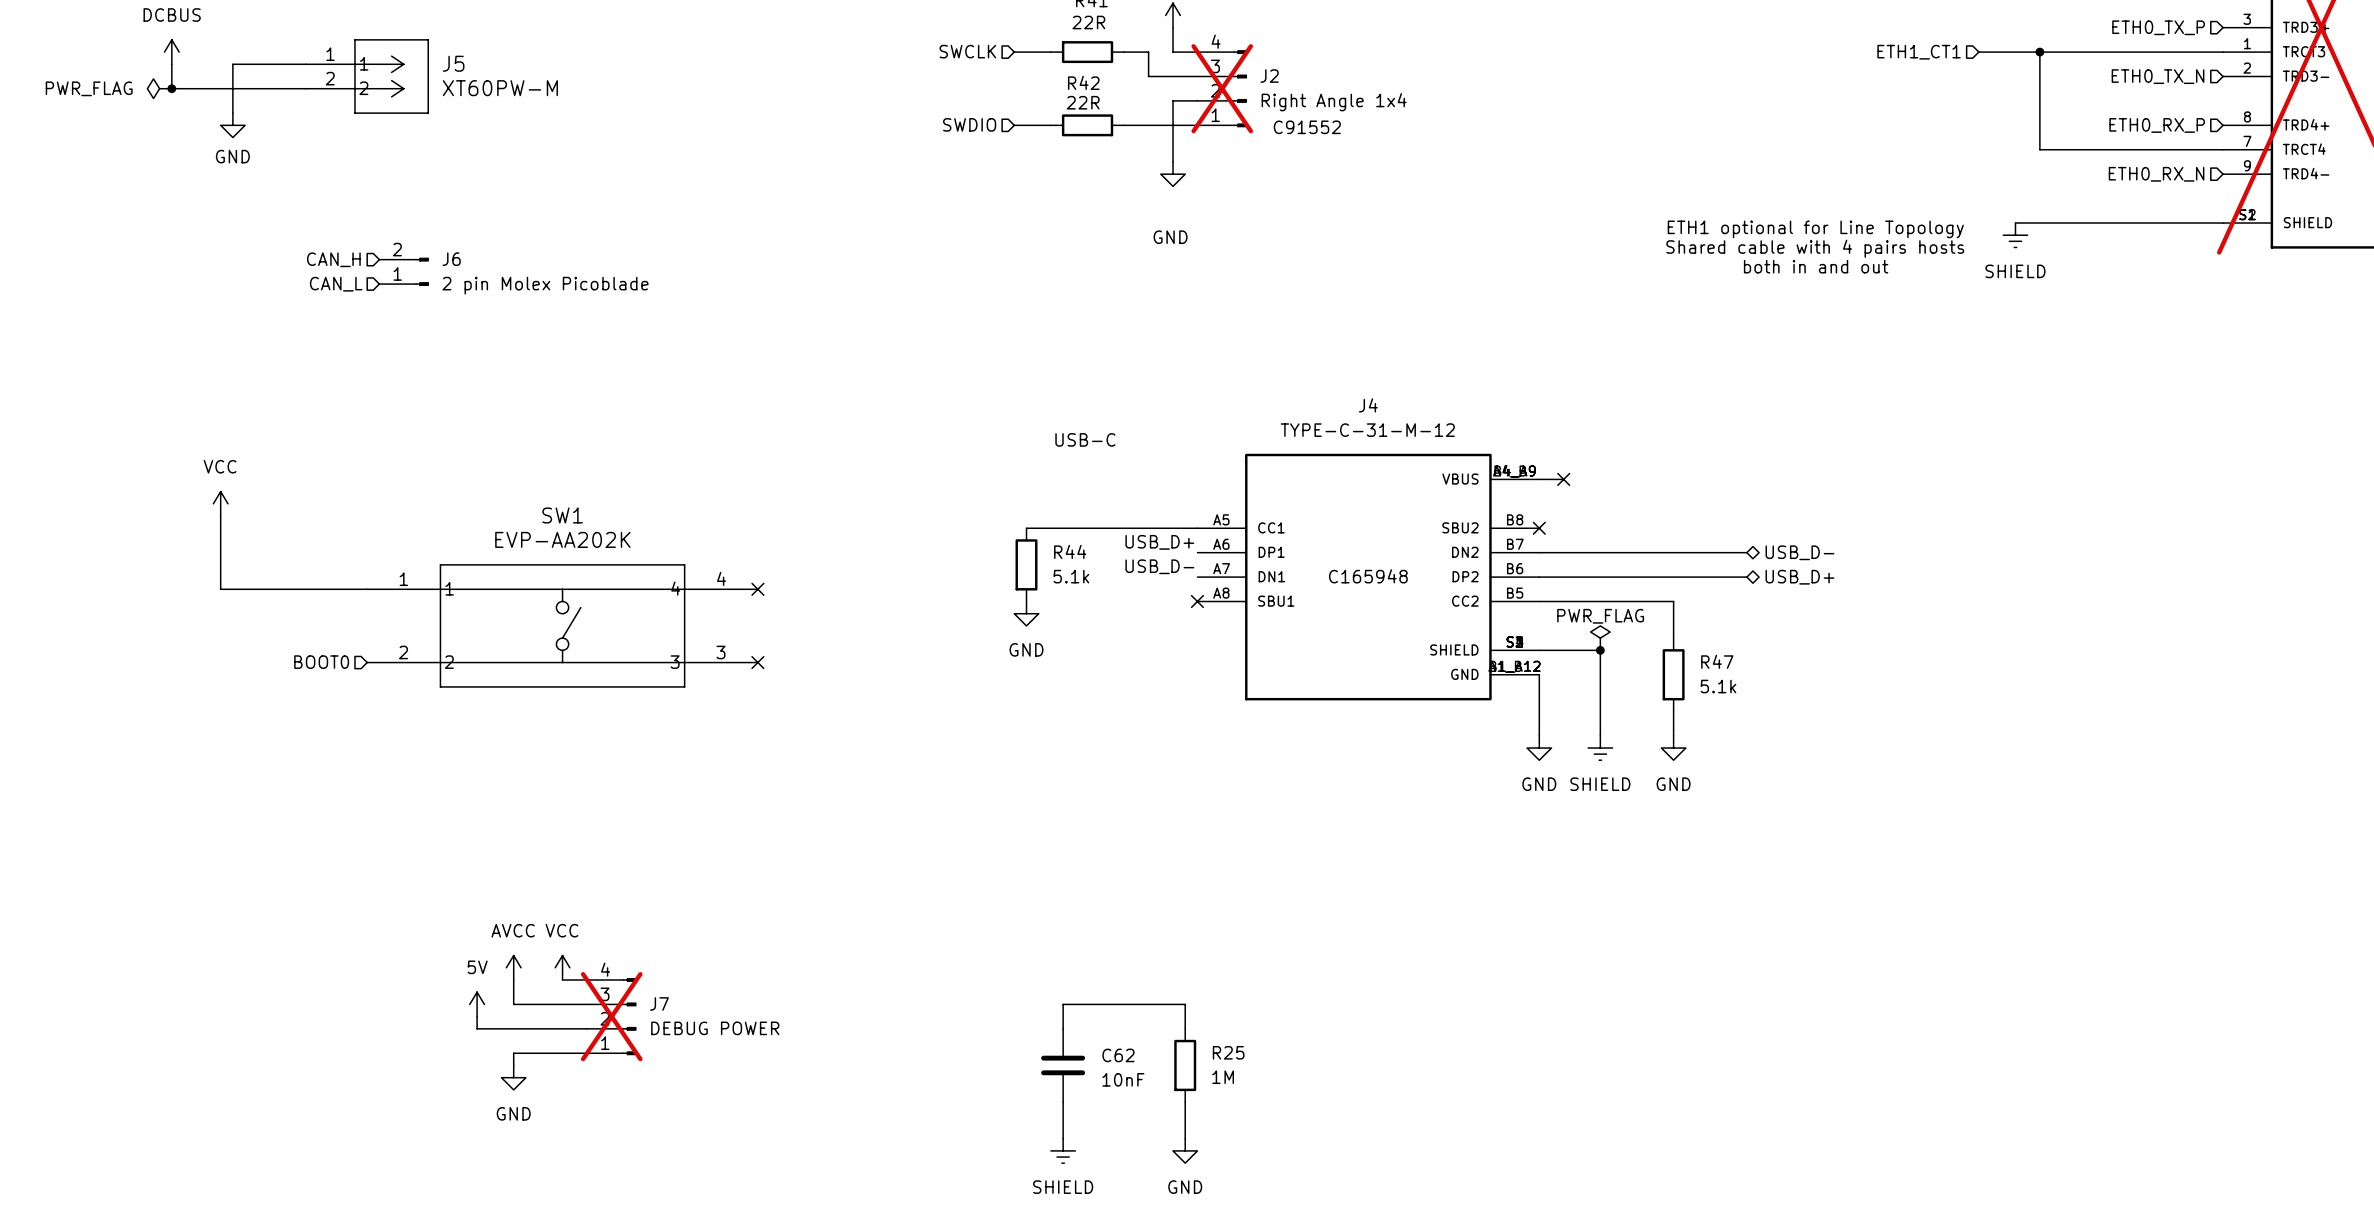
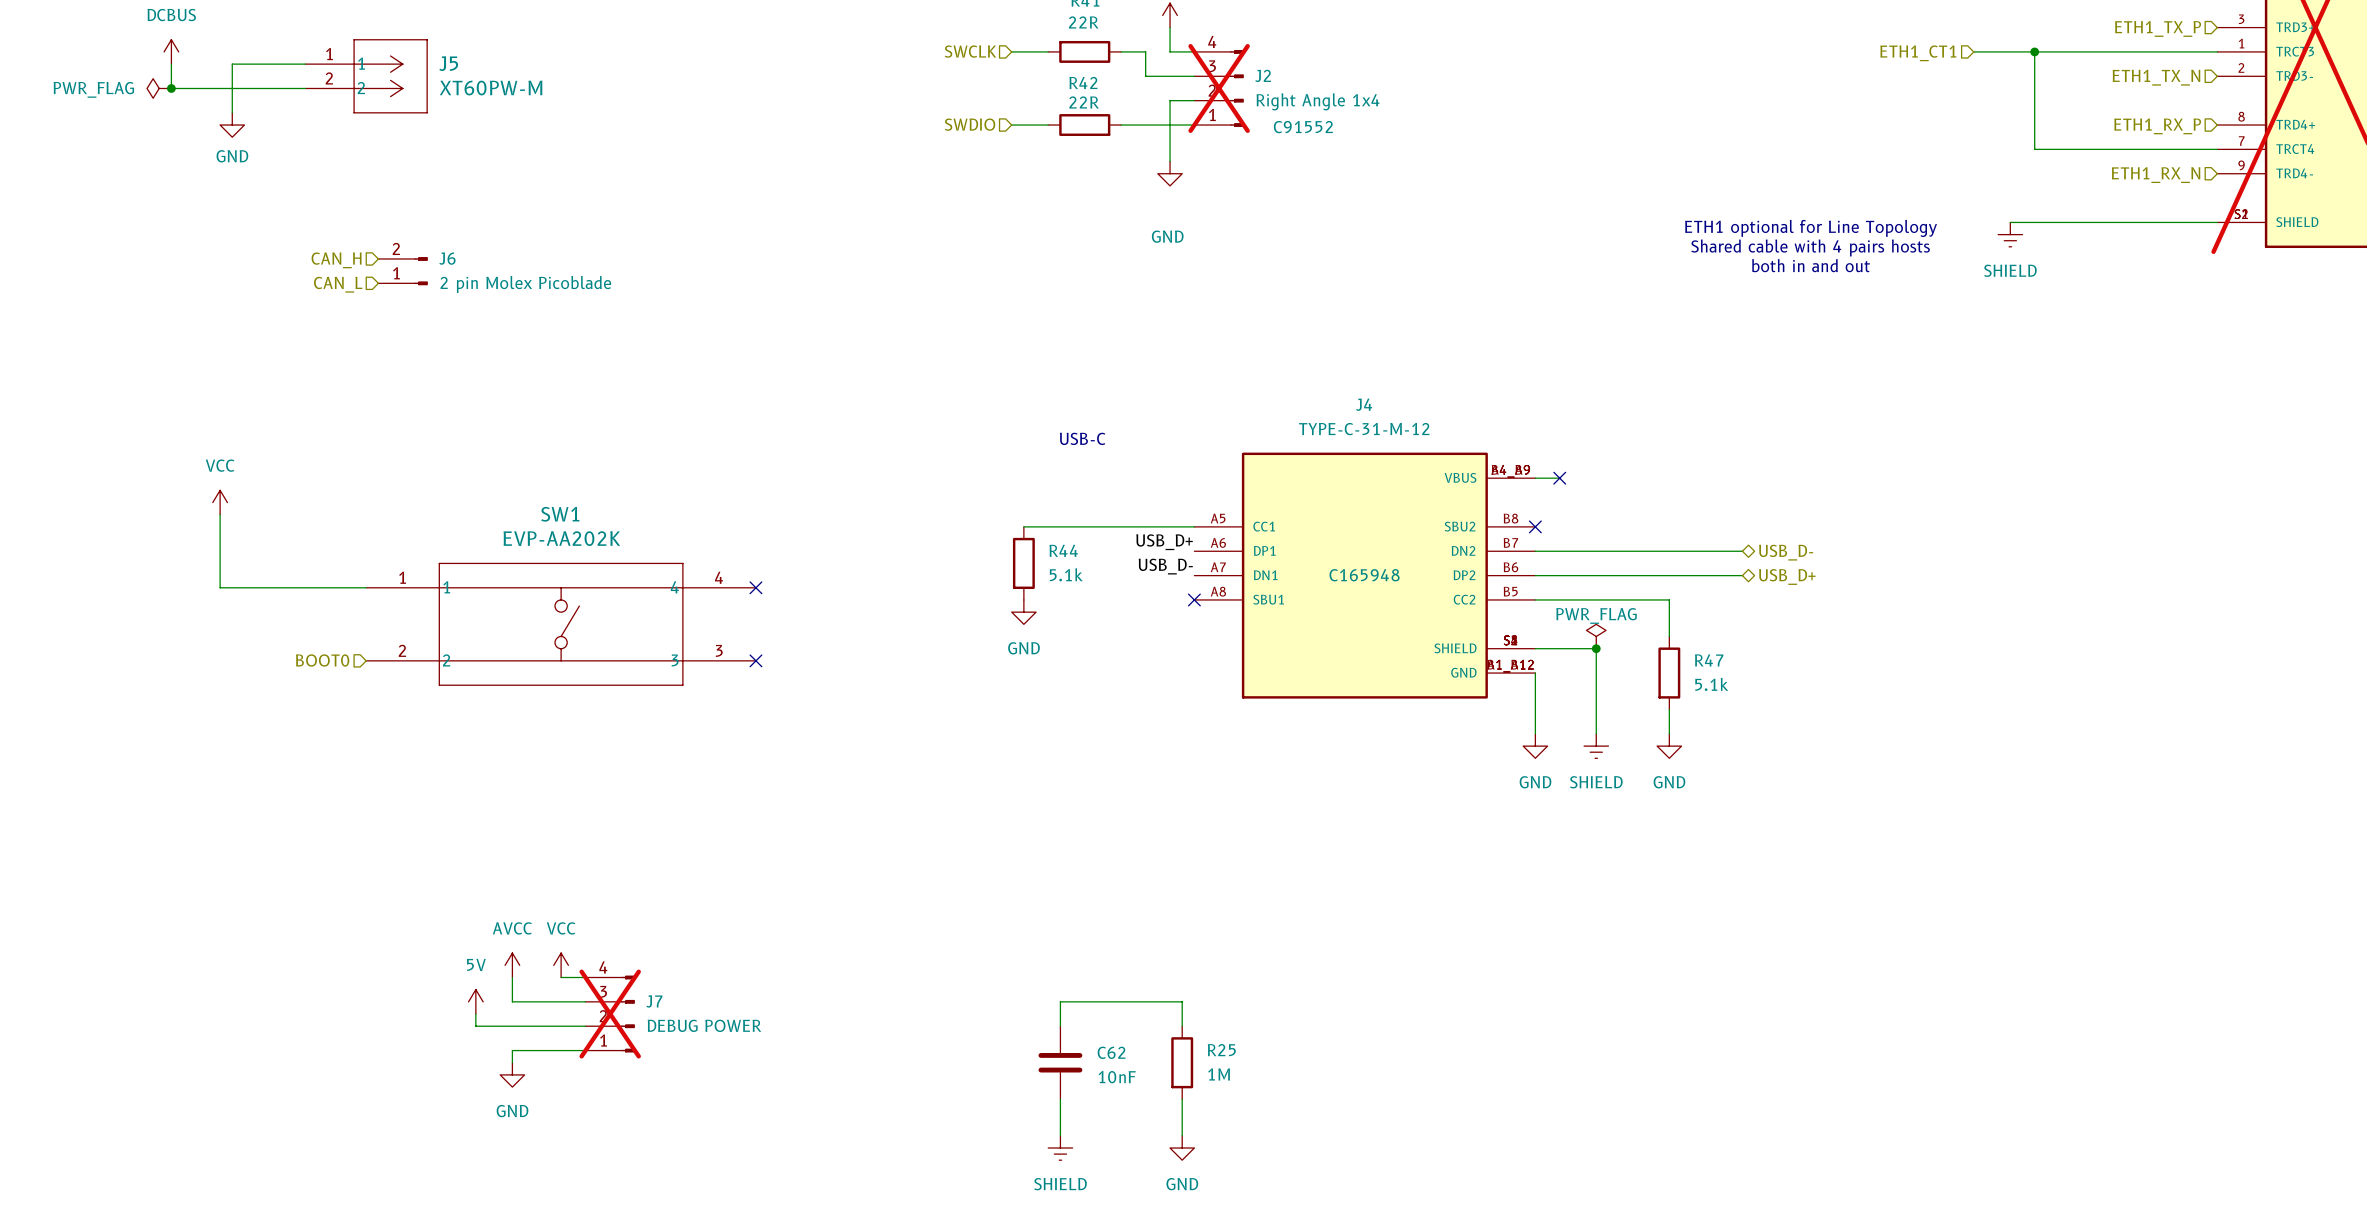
hierarchical label: ETH0_TX_P (2158, 27) -> ETH1_TX_P (2158, 28)
hierarchical label: ETH0_TX_N (2158, 76) -> ETH1_TX_N (2156, 77)
hierarchical label: ETH0_RX_P (2157, 125) -> ETH1_RX_P (2157, 126)
hierarchical label: ETH0_RX_N (2156, 174) -> ETH1_RX_N (2156, 175)

